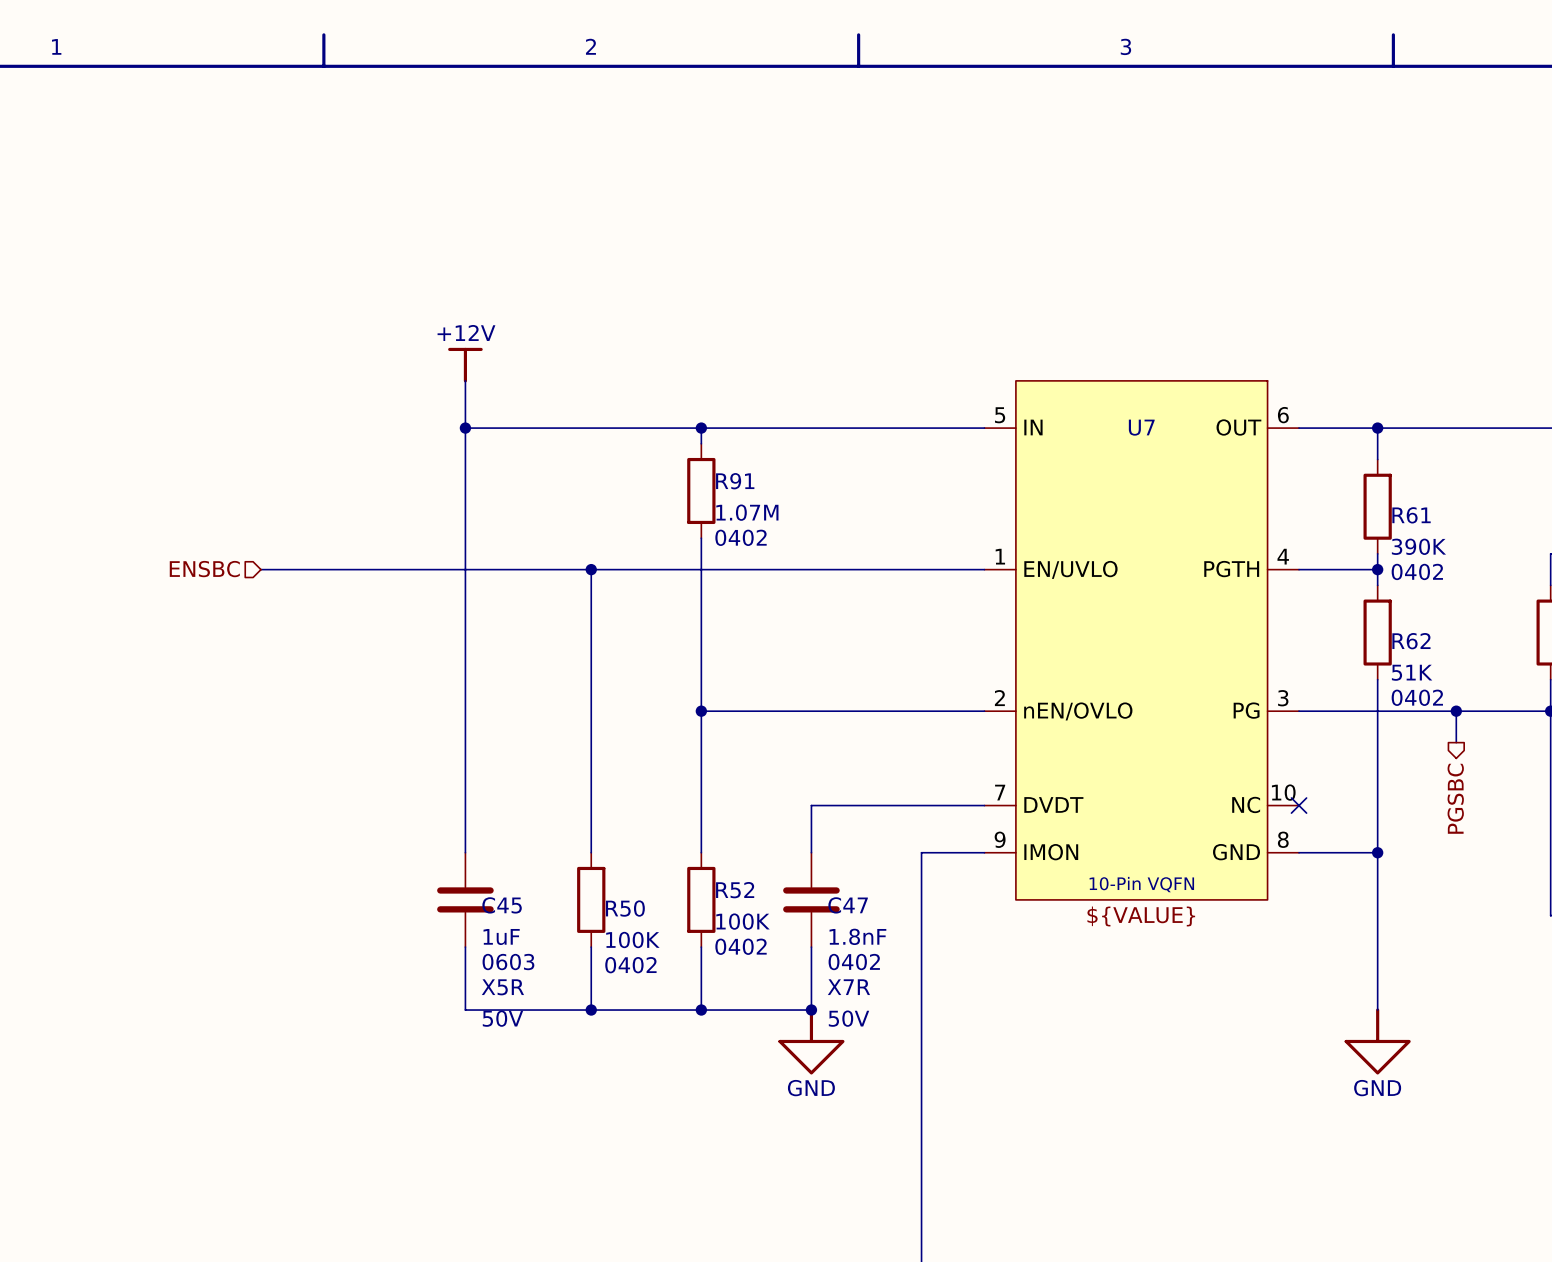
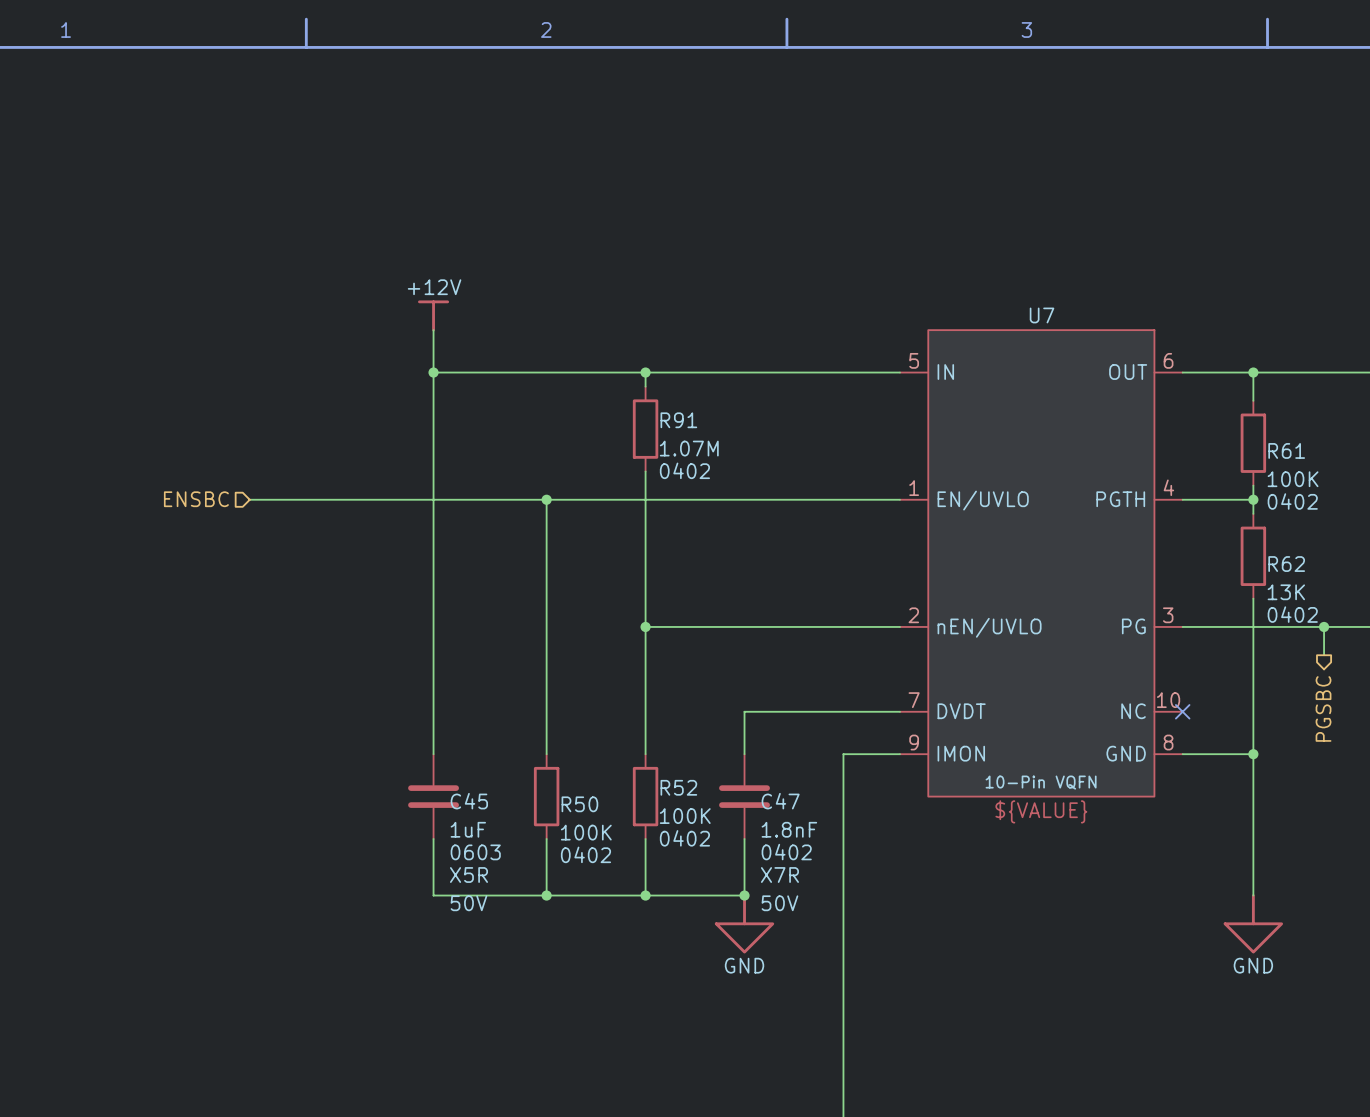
U7 name position: U7 (1141, 427) -> U7 (1042, 315)
R61 value: 390K (1418, 546) -> 100K (1293, 479)
R62 value: 51K (1412, 672) -> 13K (1286, 592)
U7 pin name: nEN/OVLO (1078, 711) -> nEN/UVLO (989, 627)

